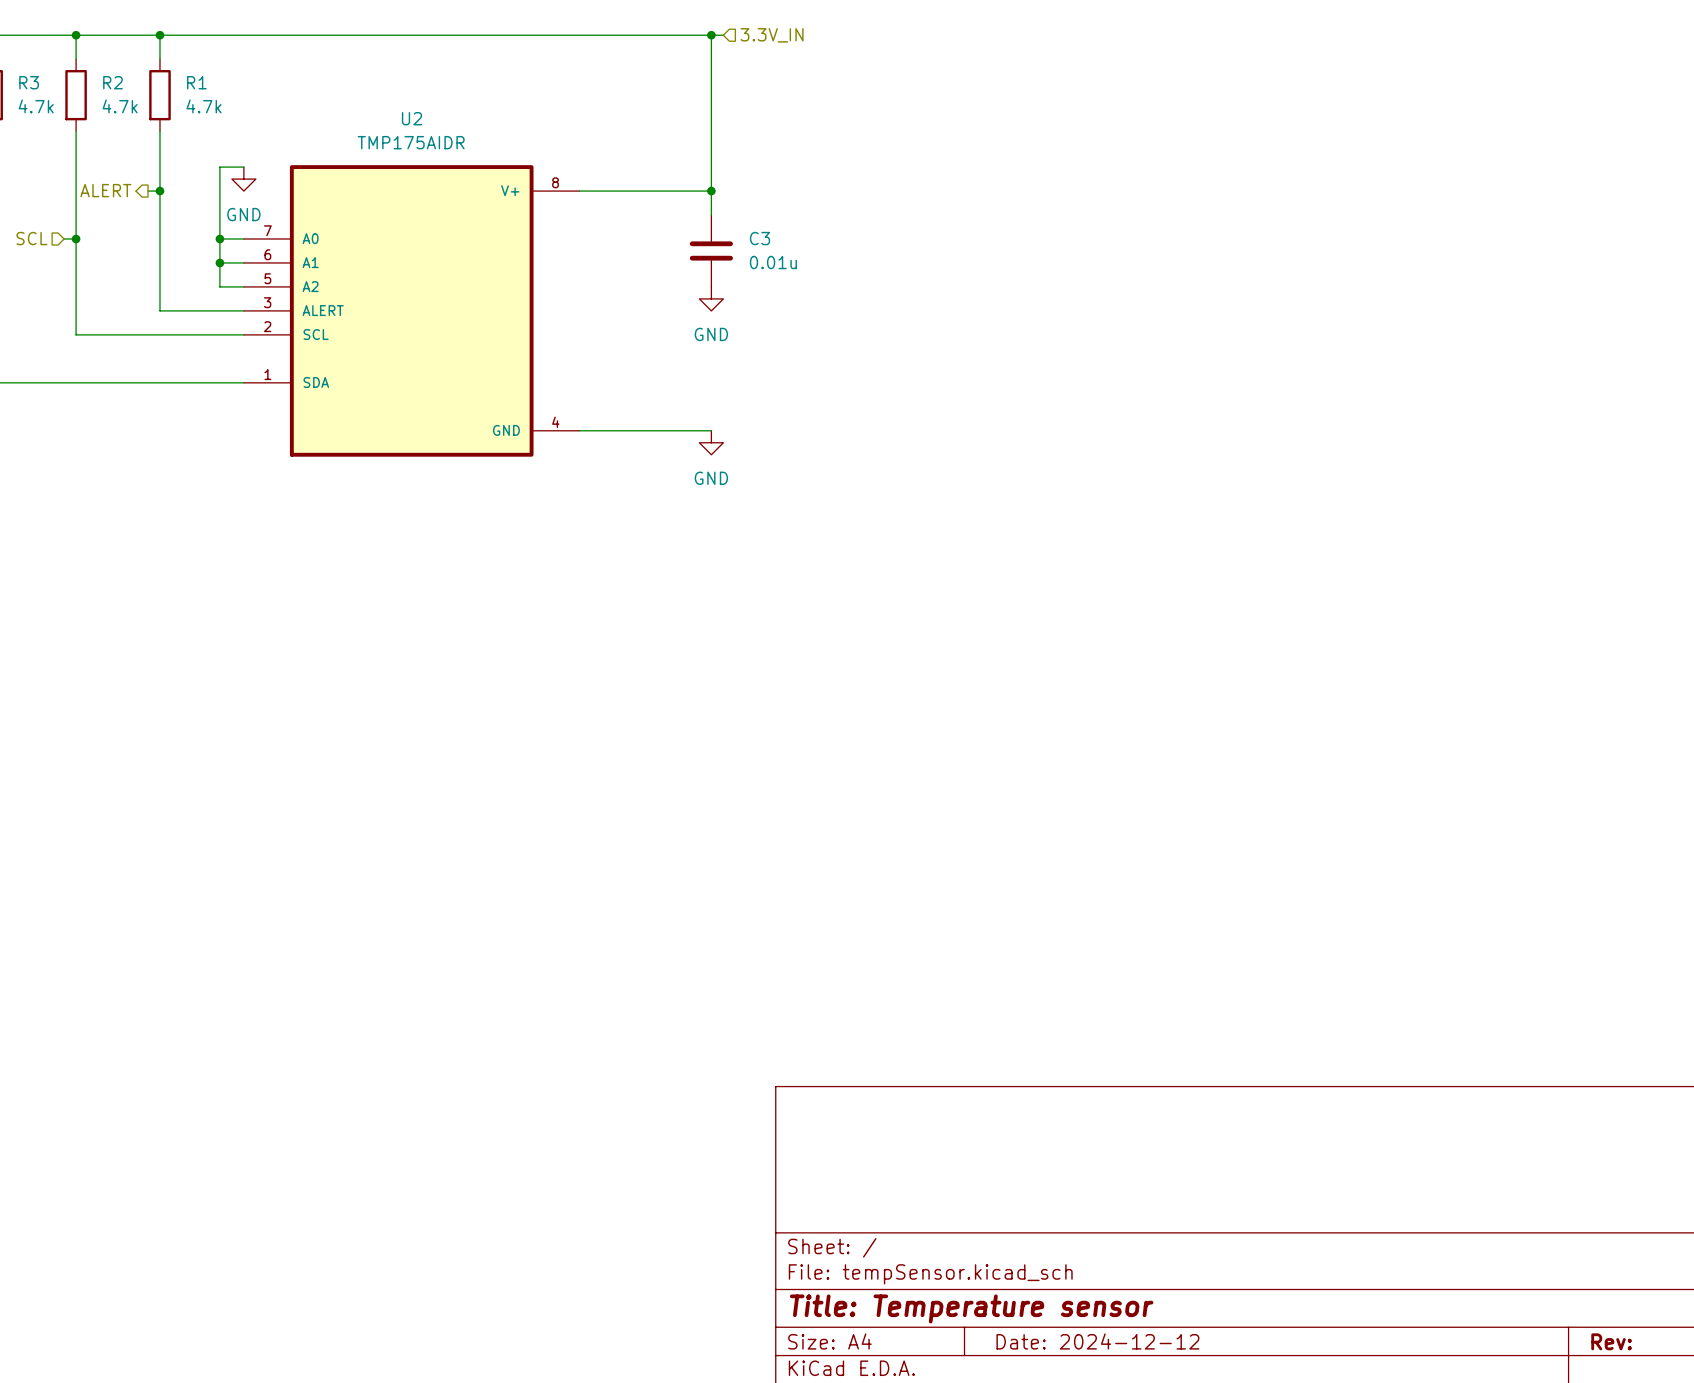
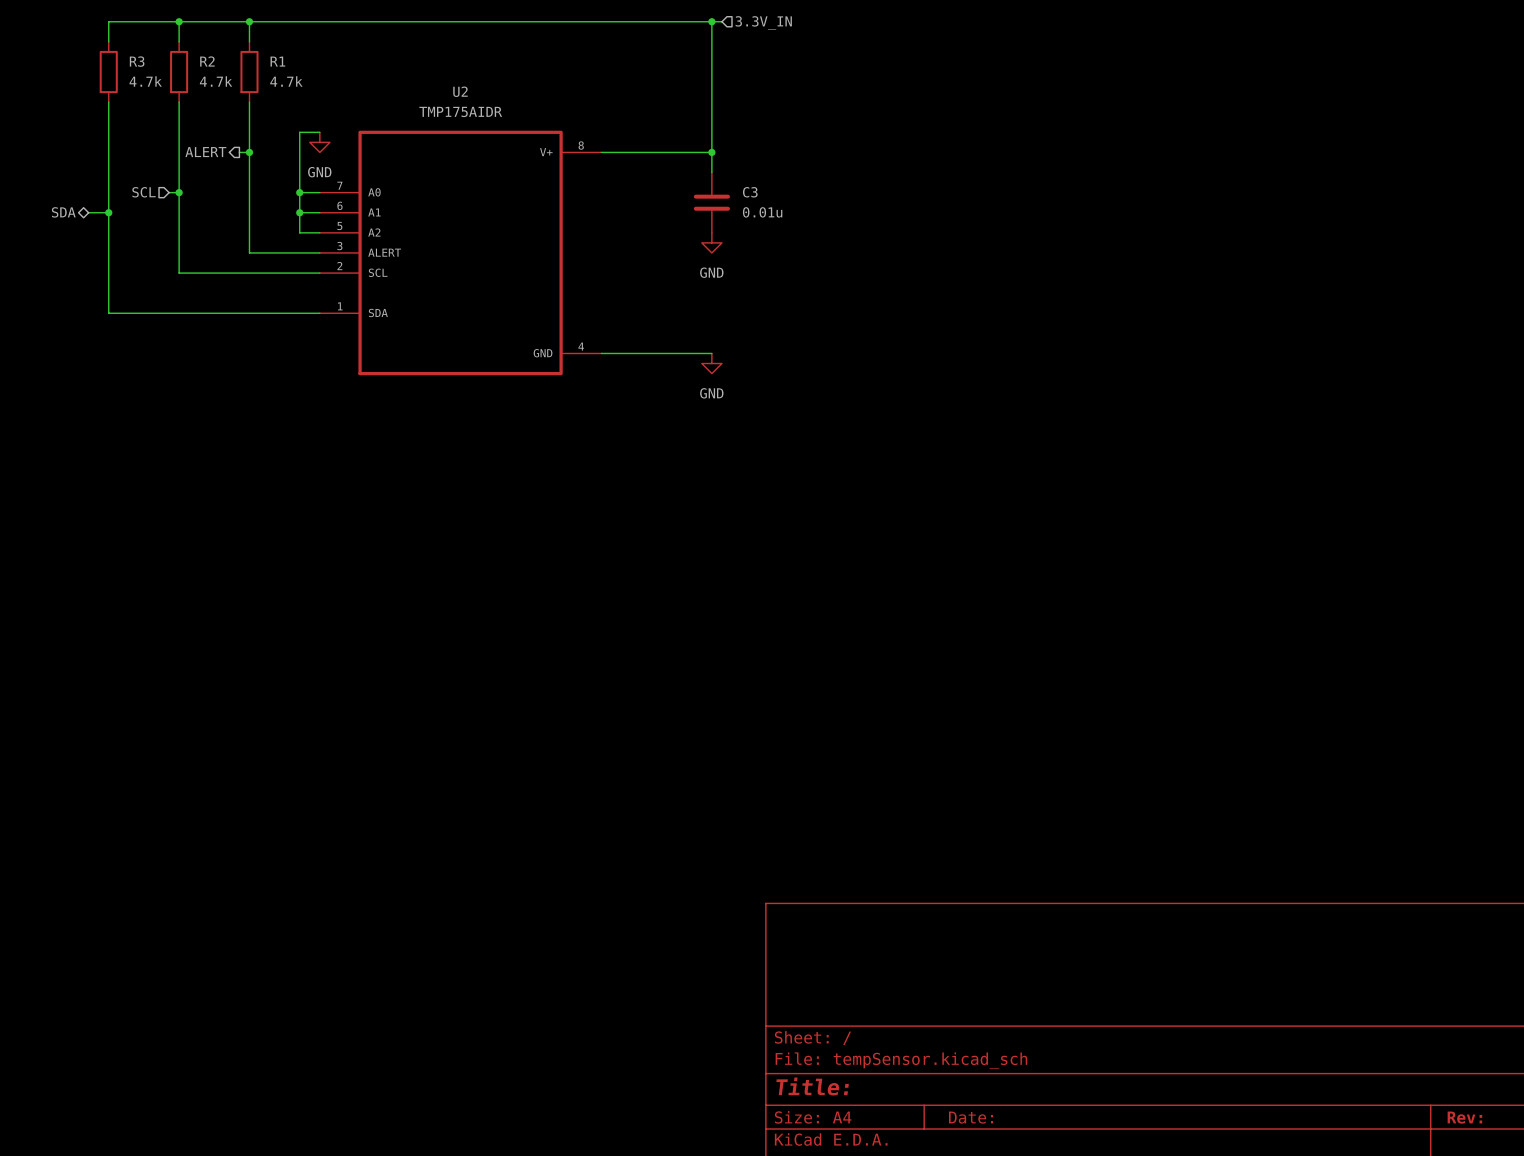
title block: Title: Temperature sensor (971, 1308) -> Title: (812, 1086)
title block: Date: 2024-12-12 (1097, 1341) -> Date: (971, 1117)

